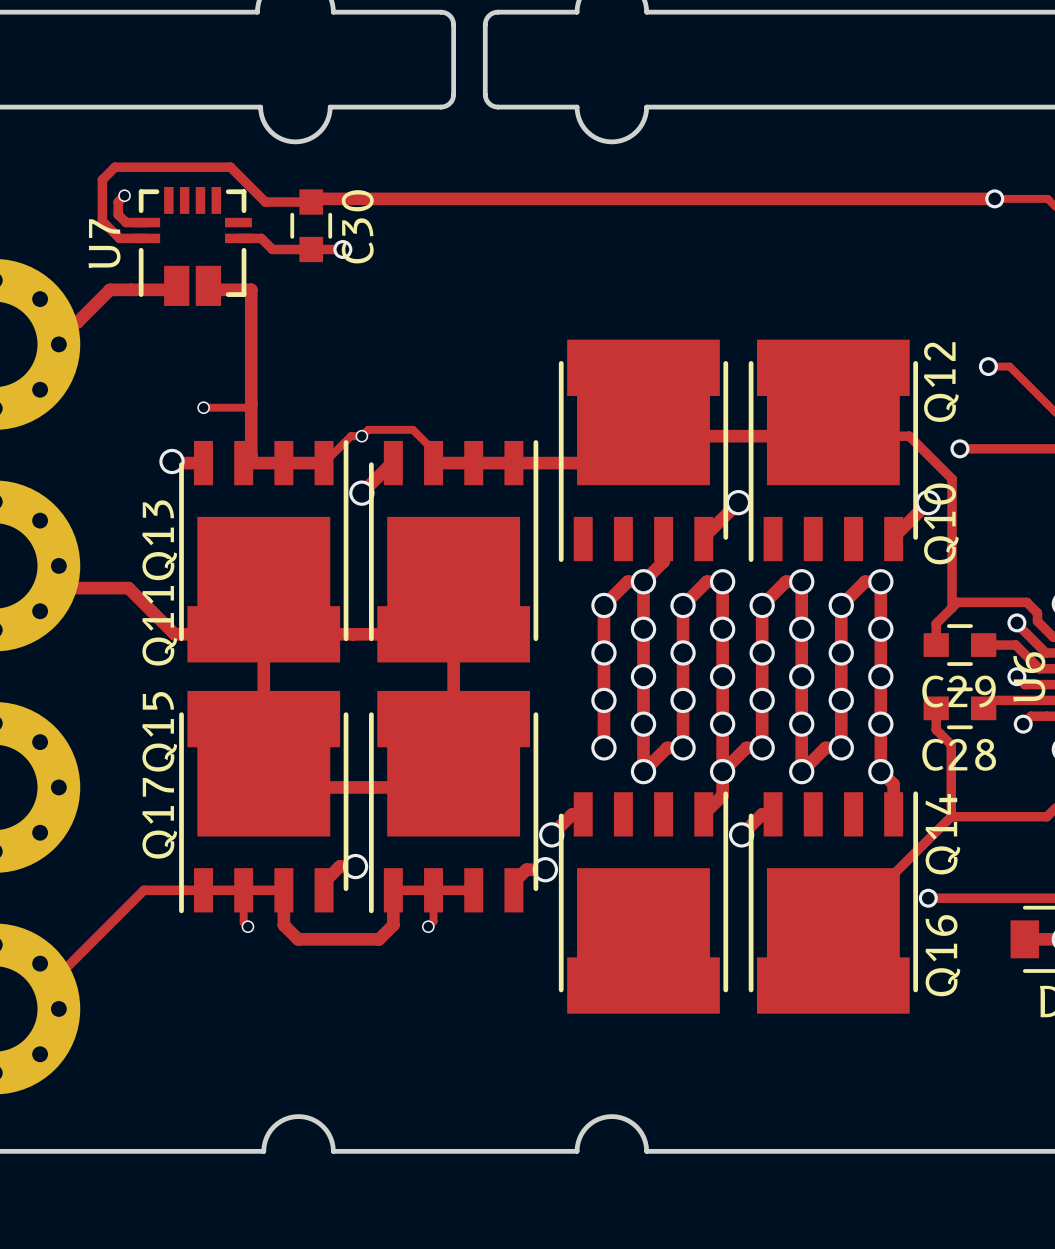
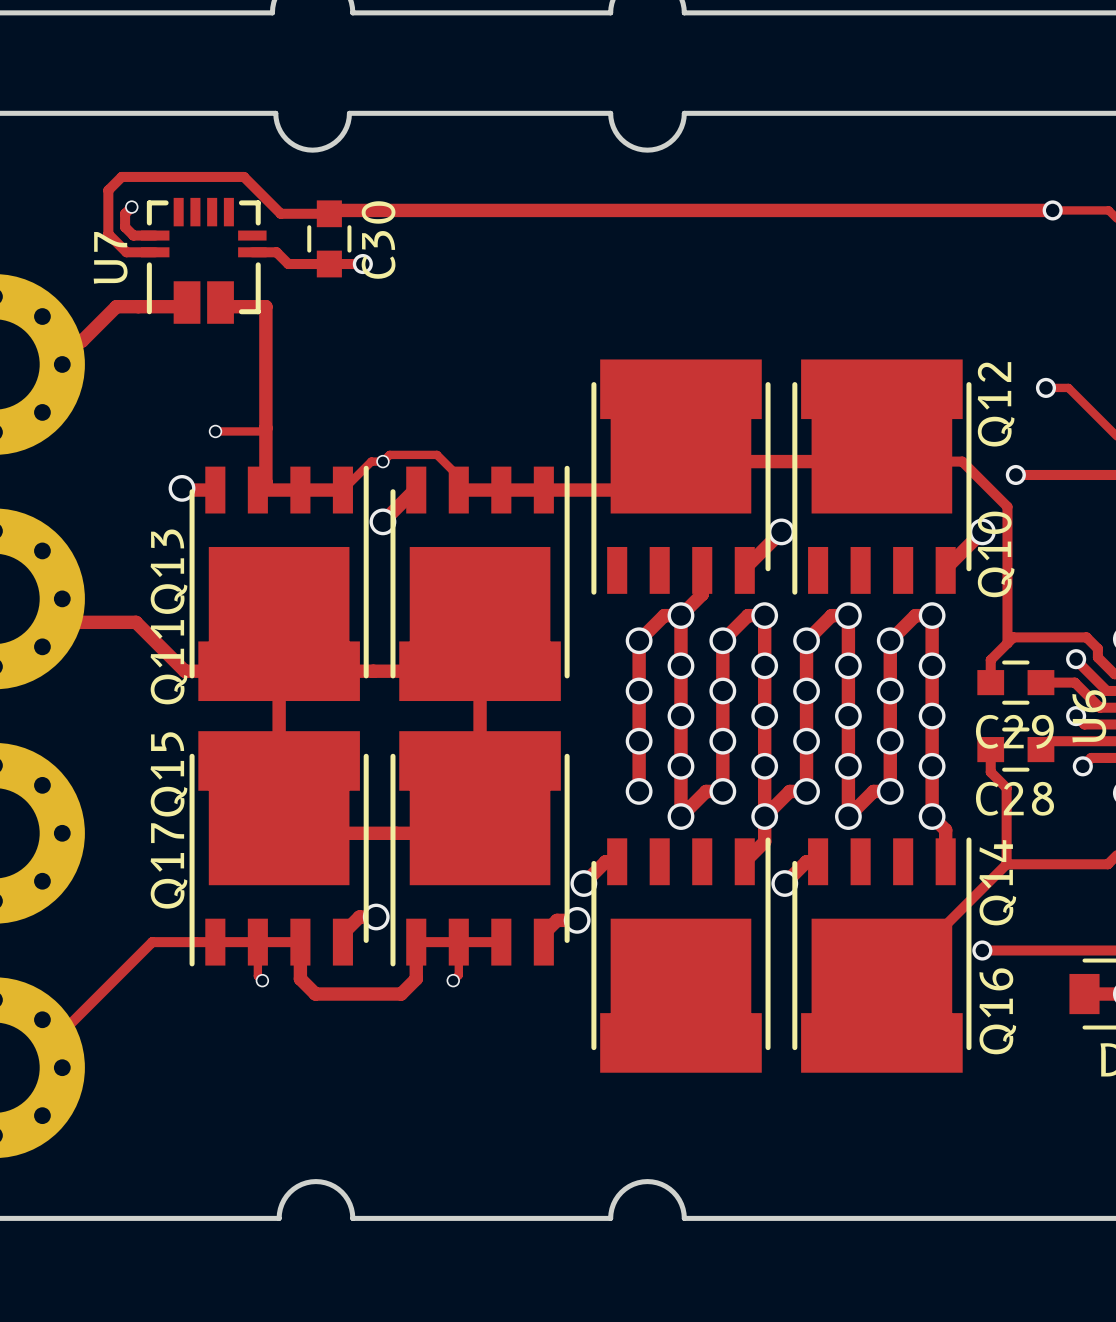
board edge: (440, 12) (449, 15) (453, 24) (453, 96) (448, 104) (440, 107) -> (466, 12) (526, 12)
board edge: (497, 12) (488, 15) (485, 24) (485, 96) (490, 104) (497, 107) -> (466, 113) (526, 113)

